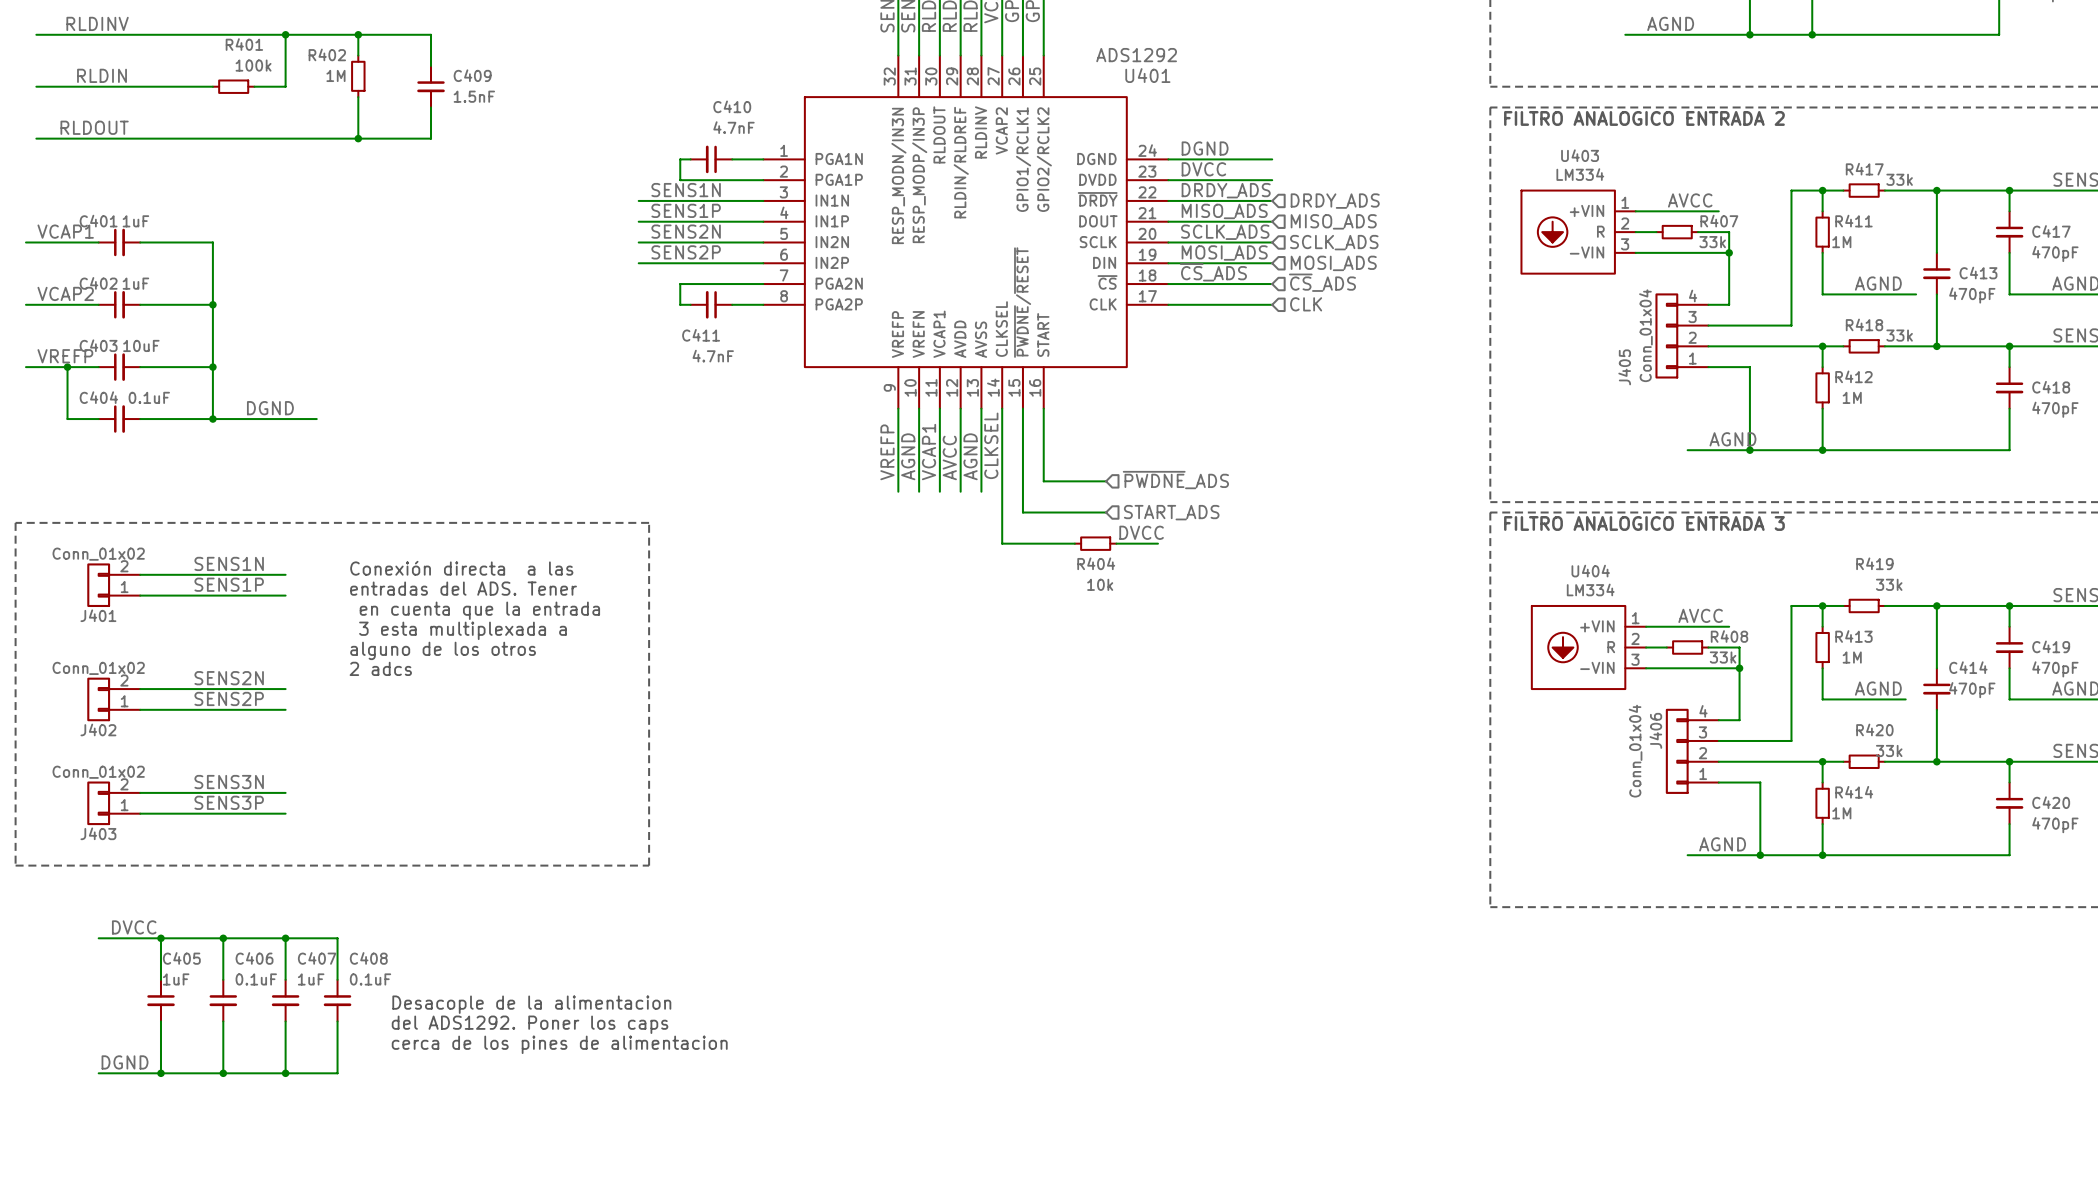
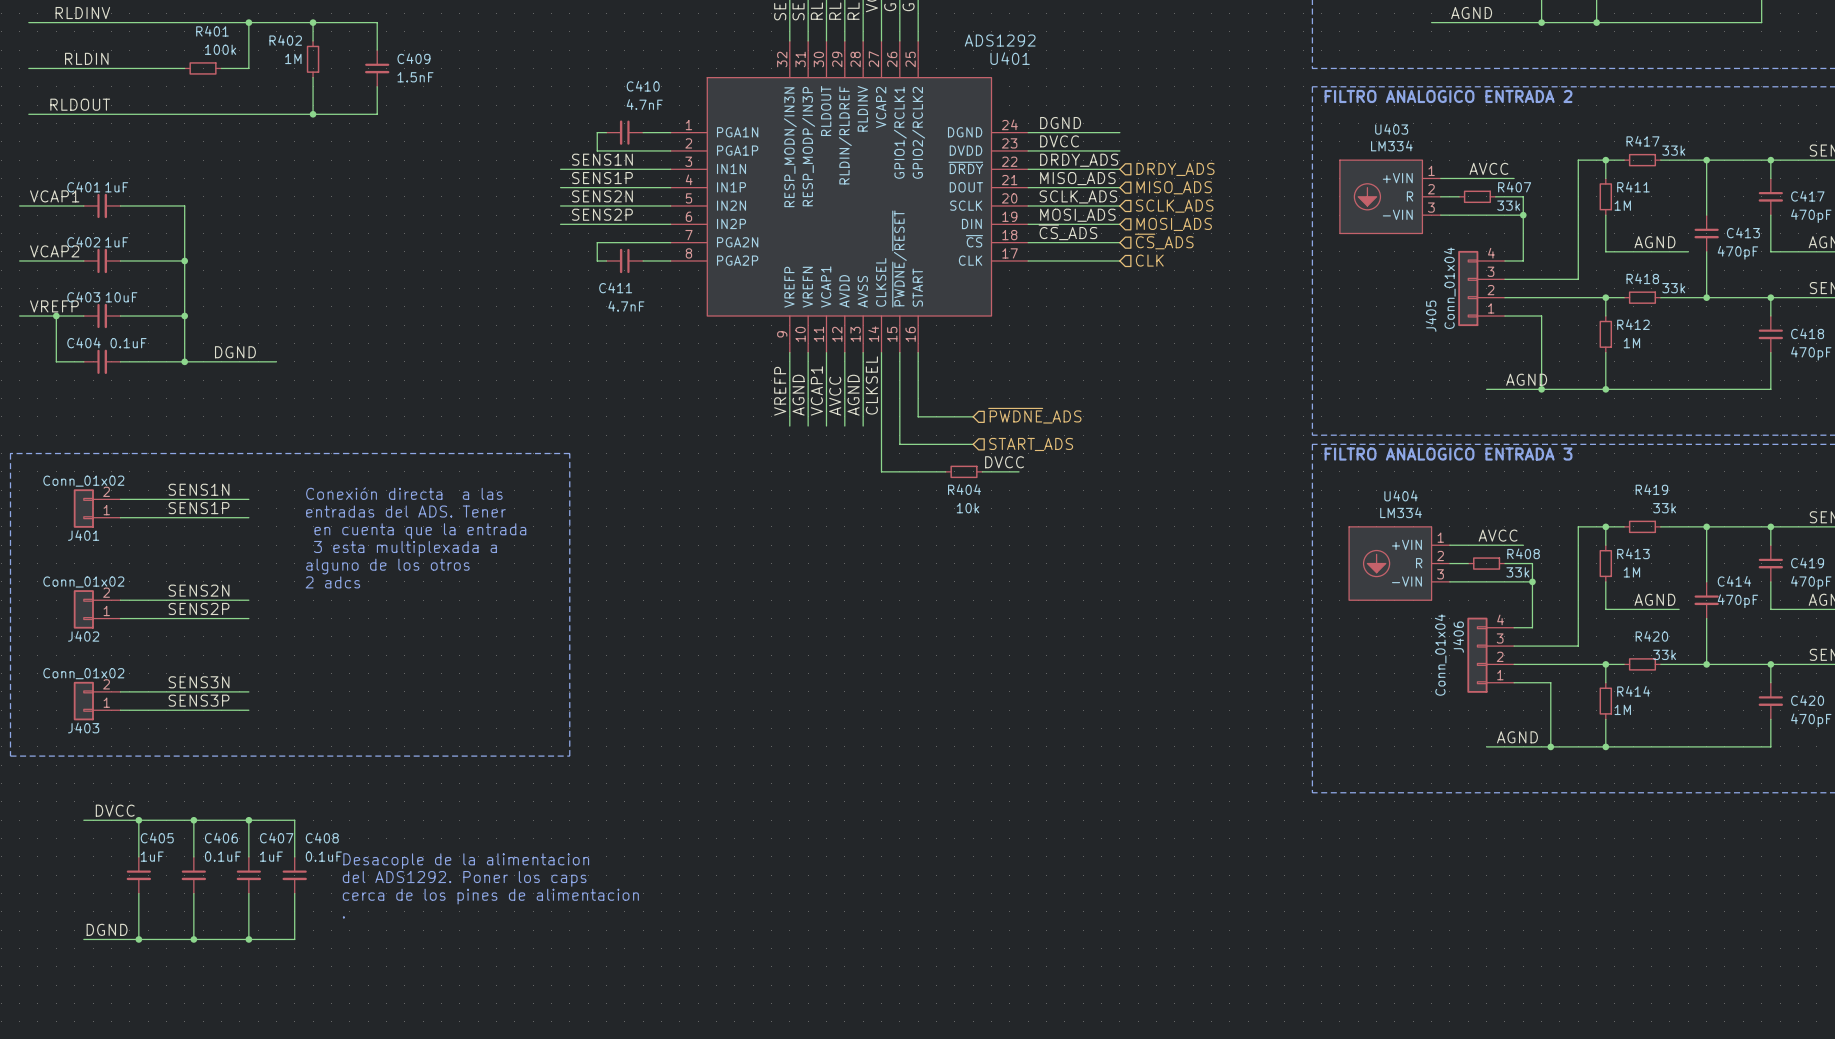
text: none -> Desacople de la alimentacion (466, 861)
text: Desacople de la alimentacion (531, 1004) -> del ADS1292. Poner los caps (464, 878)
text: del ADS1292. Poner los caps (530, 1024) -> cerca de los pines de alimentacion (490, 896)
text: cerca de los pines de alimentacion (559, 1044) -> . (343, 917)

